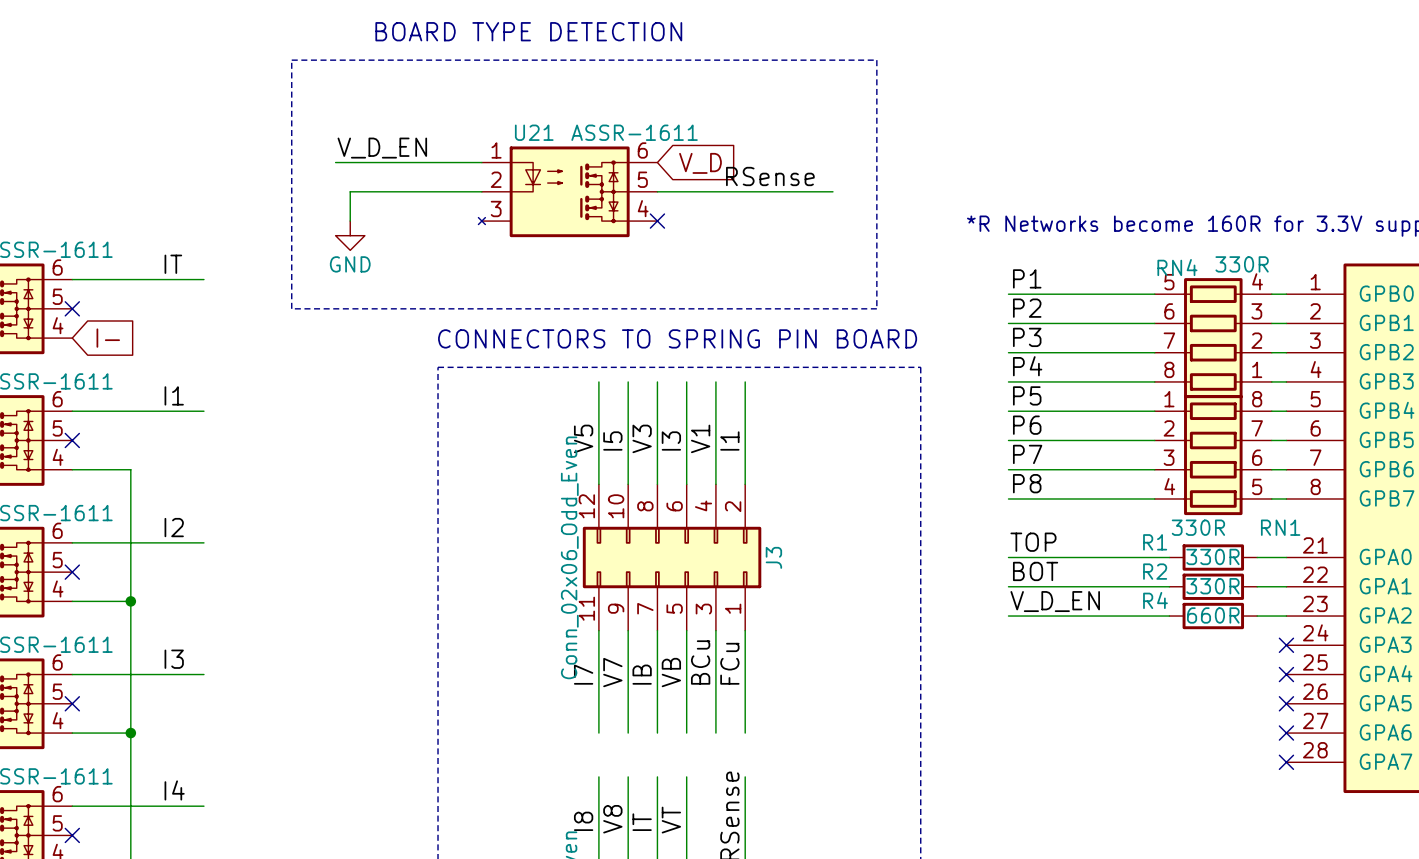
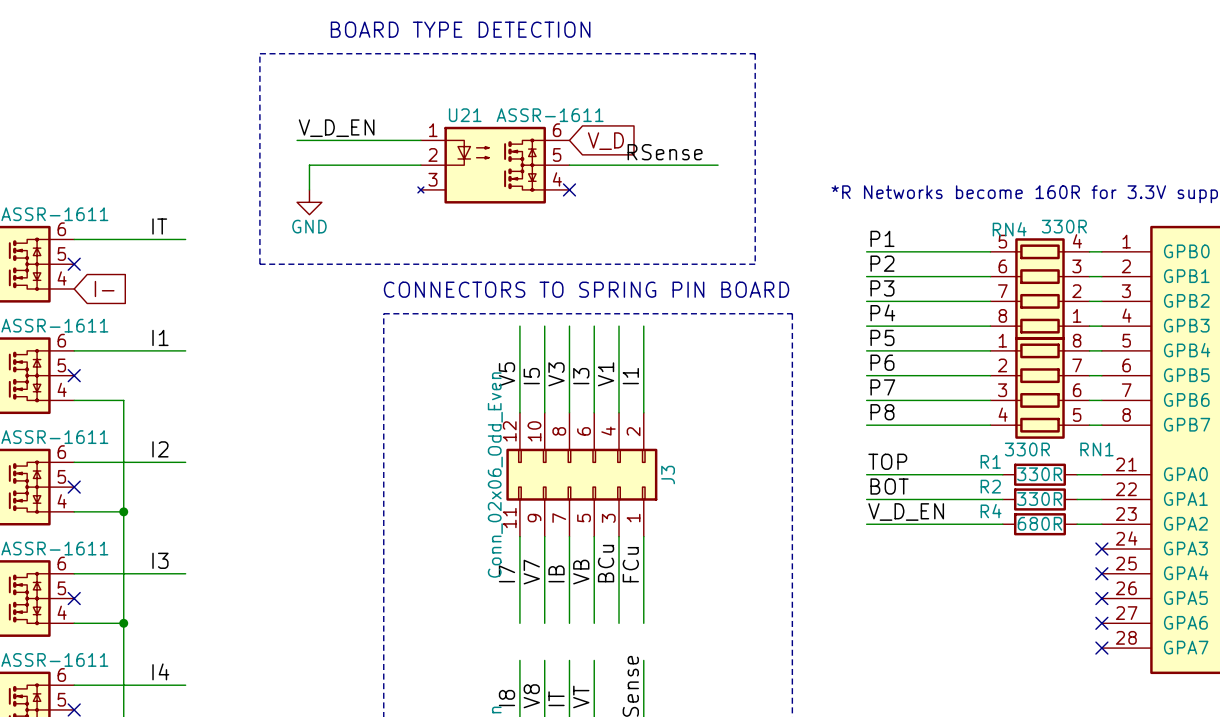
R4 value: 660R (1213, 615) -> 680R (1039, 523)

